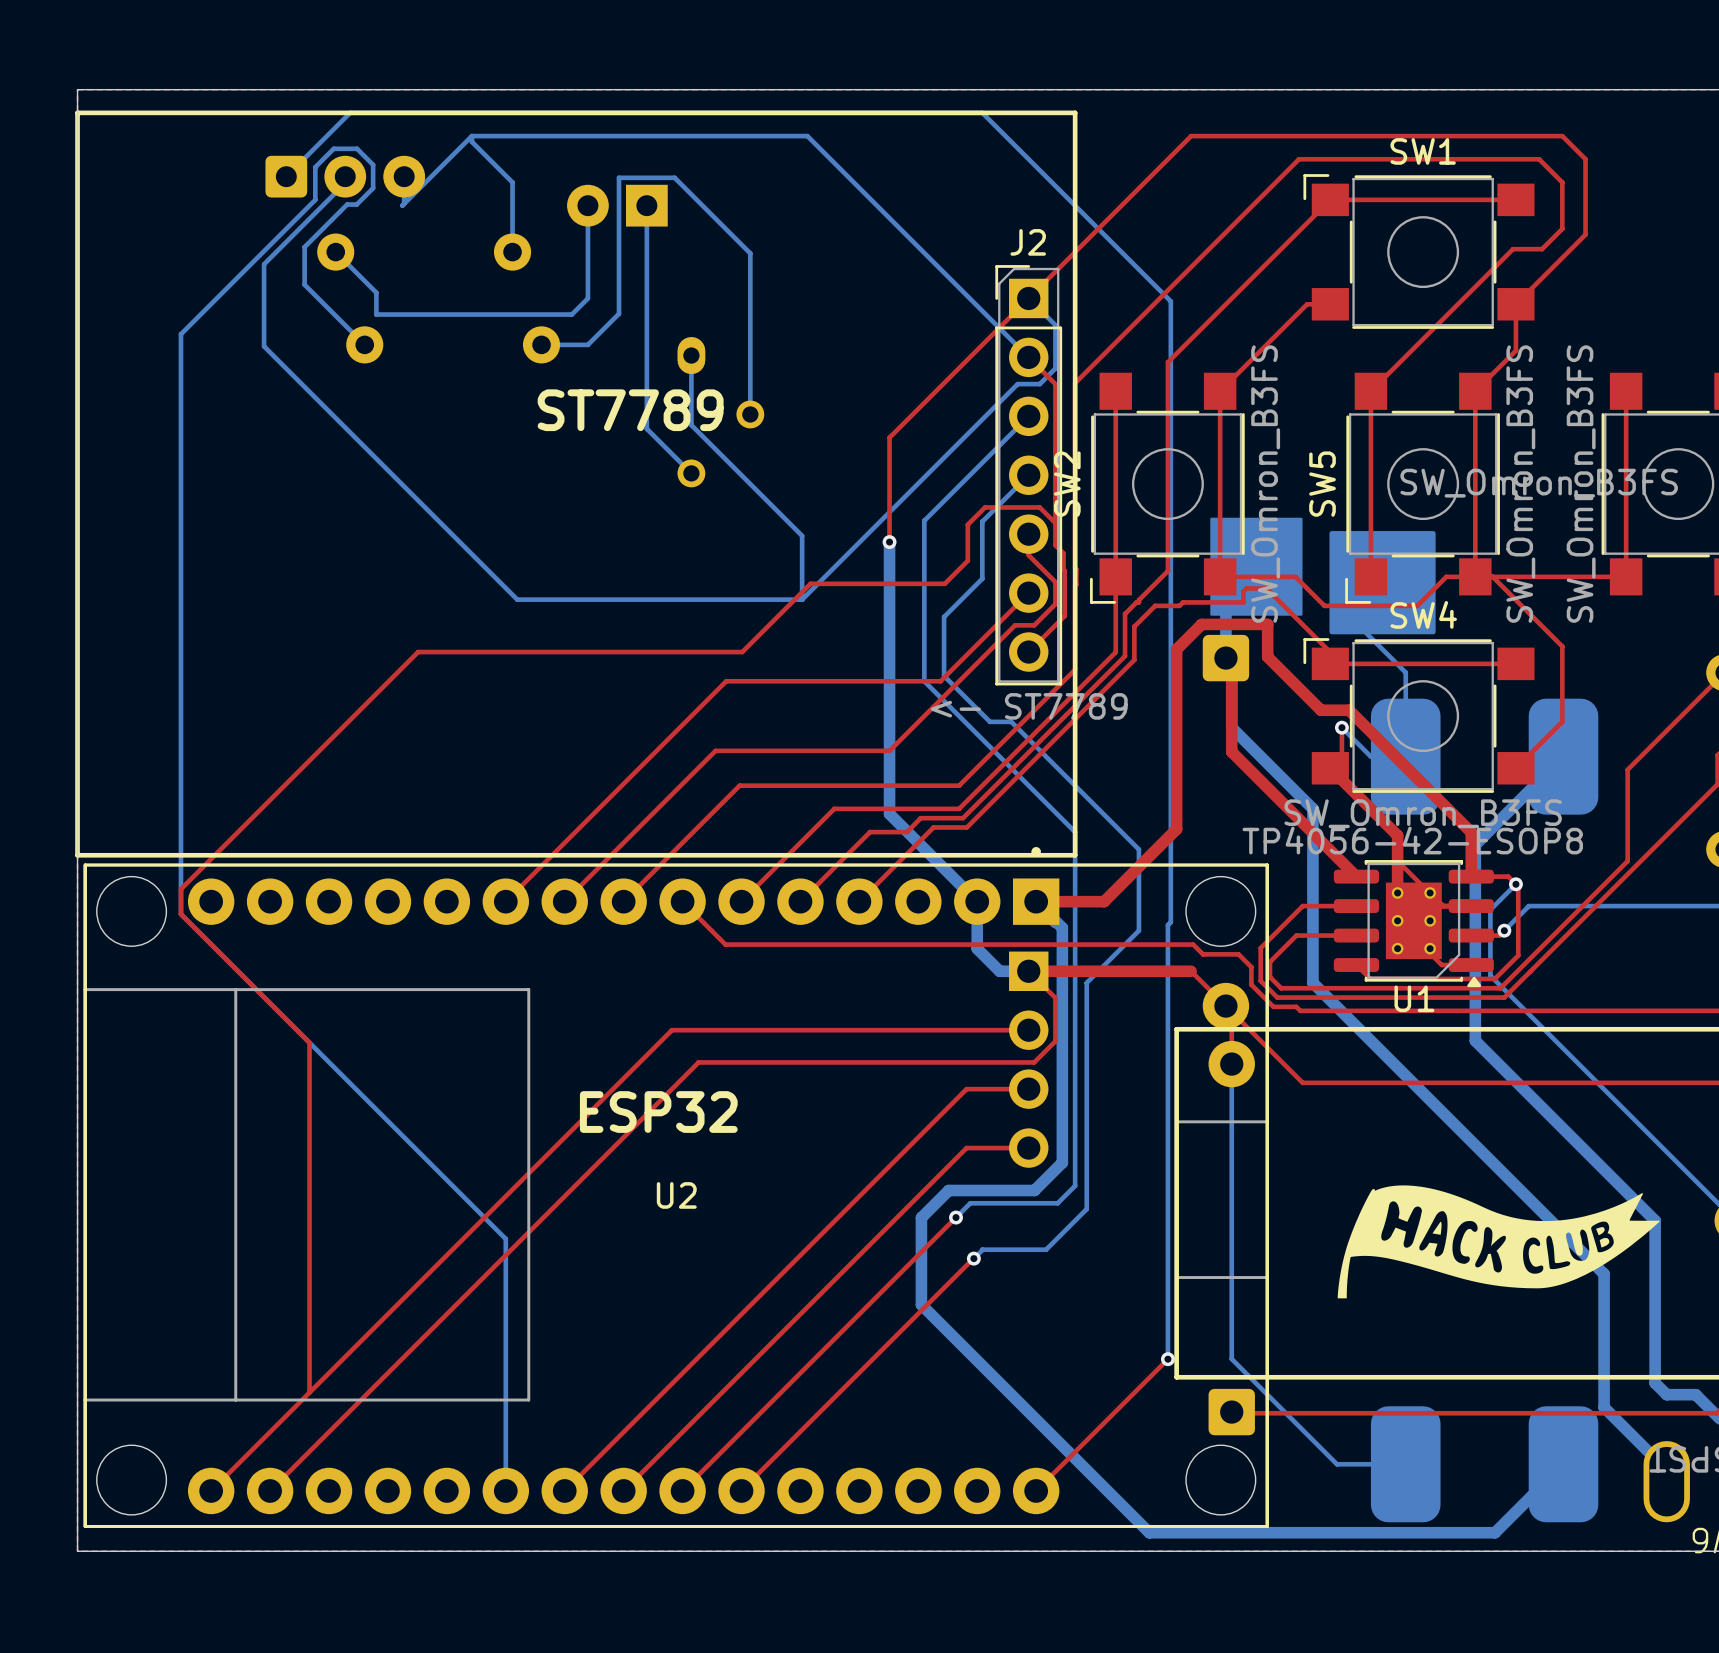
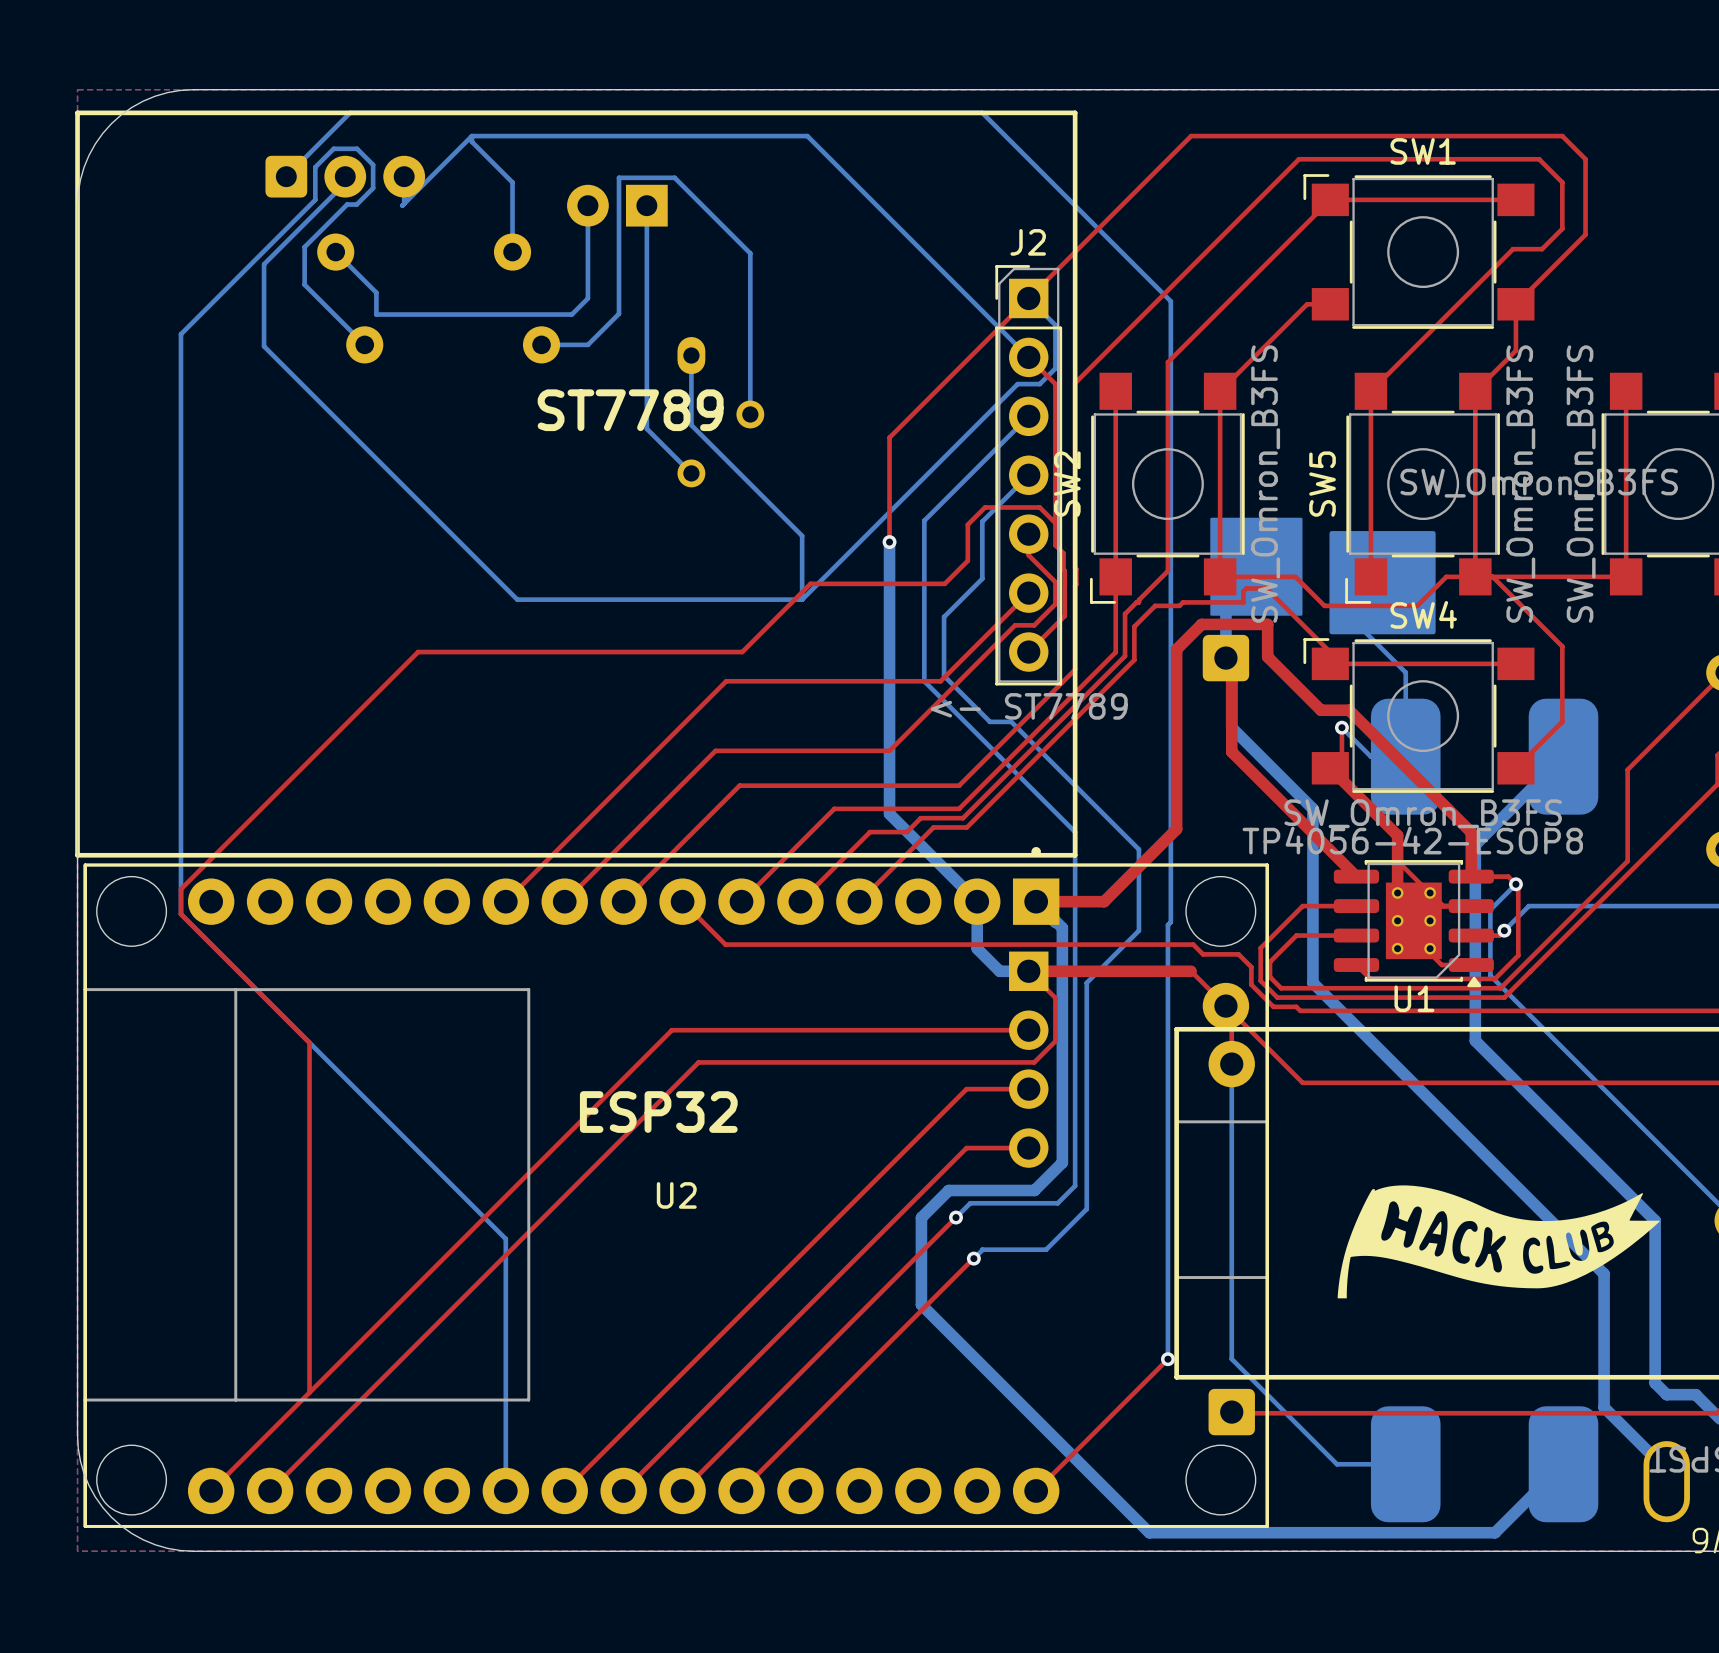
board edge: (193, 89) (77, 89) (77, 205) -> (193, 89) (155, 96) (131, 107) (111, 123) (95, 143) (84, 167) (77, 205)
board edge: (77, 1435) (77, 1551) (193, 1551) -> (77, 1435) (84, 1473) (95, 1497) (111, 1517) (131, 1533) (155, 1544) (193, 1551)

